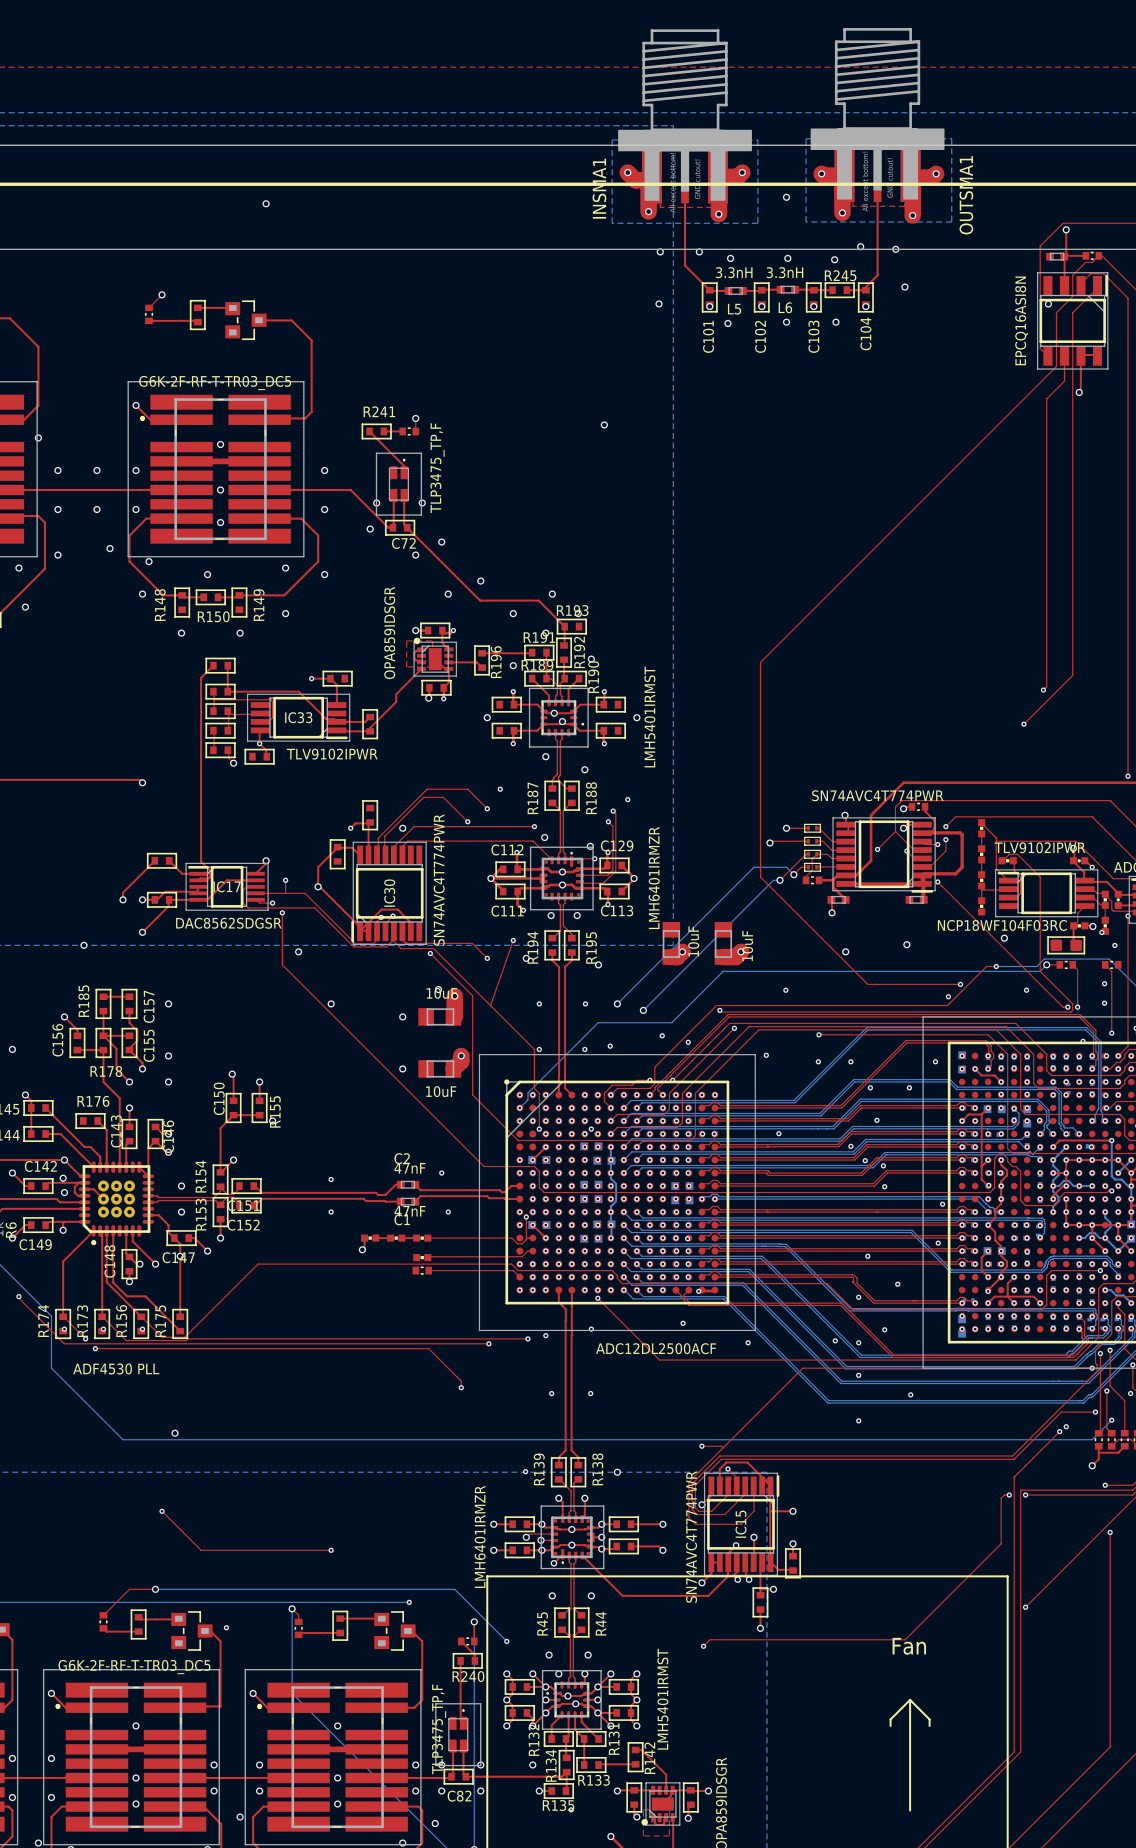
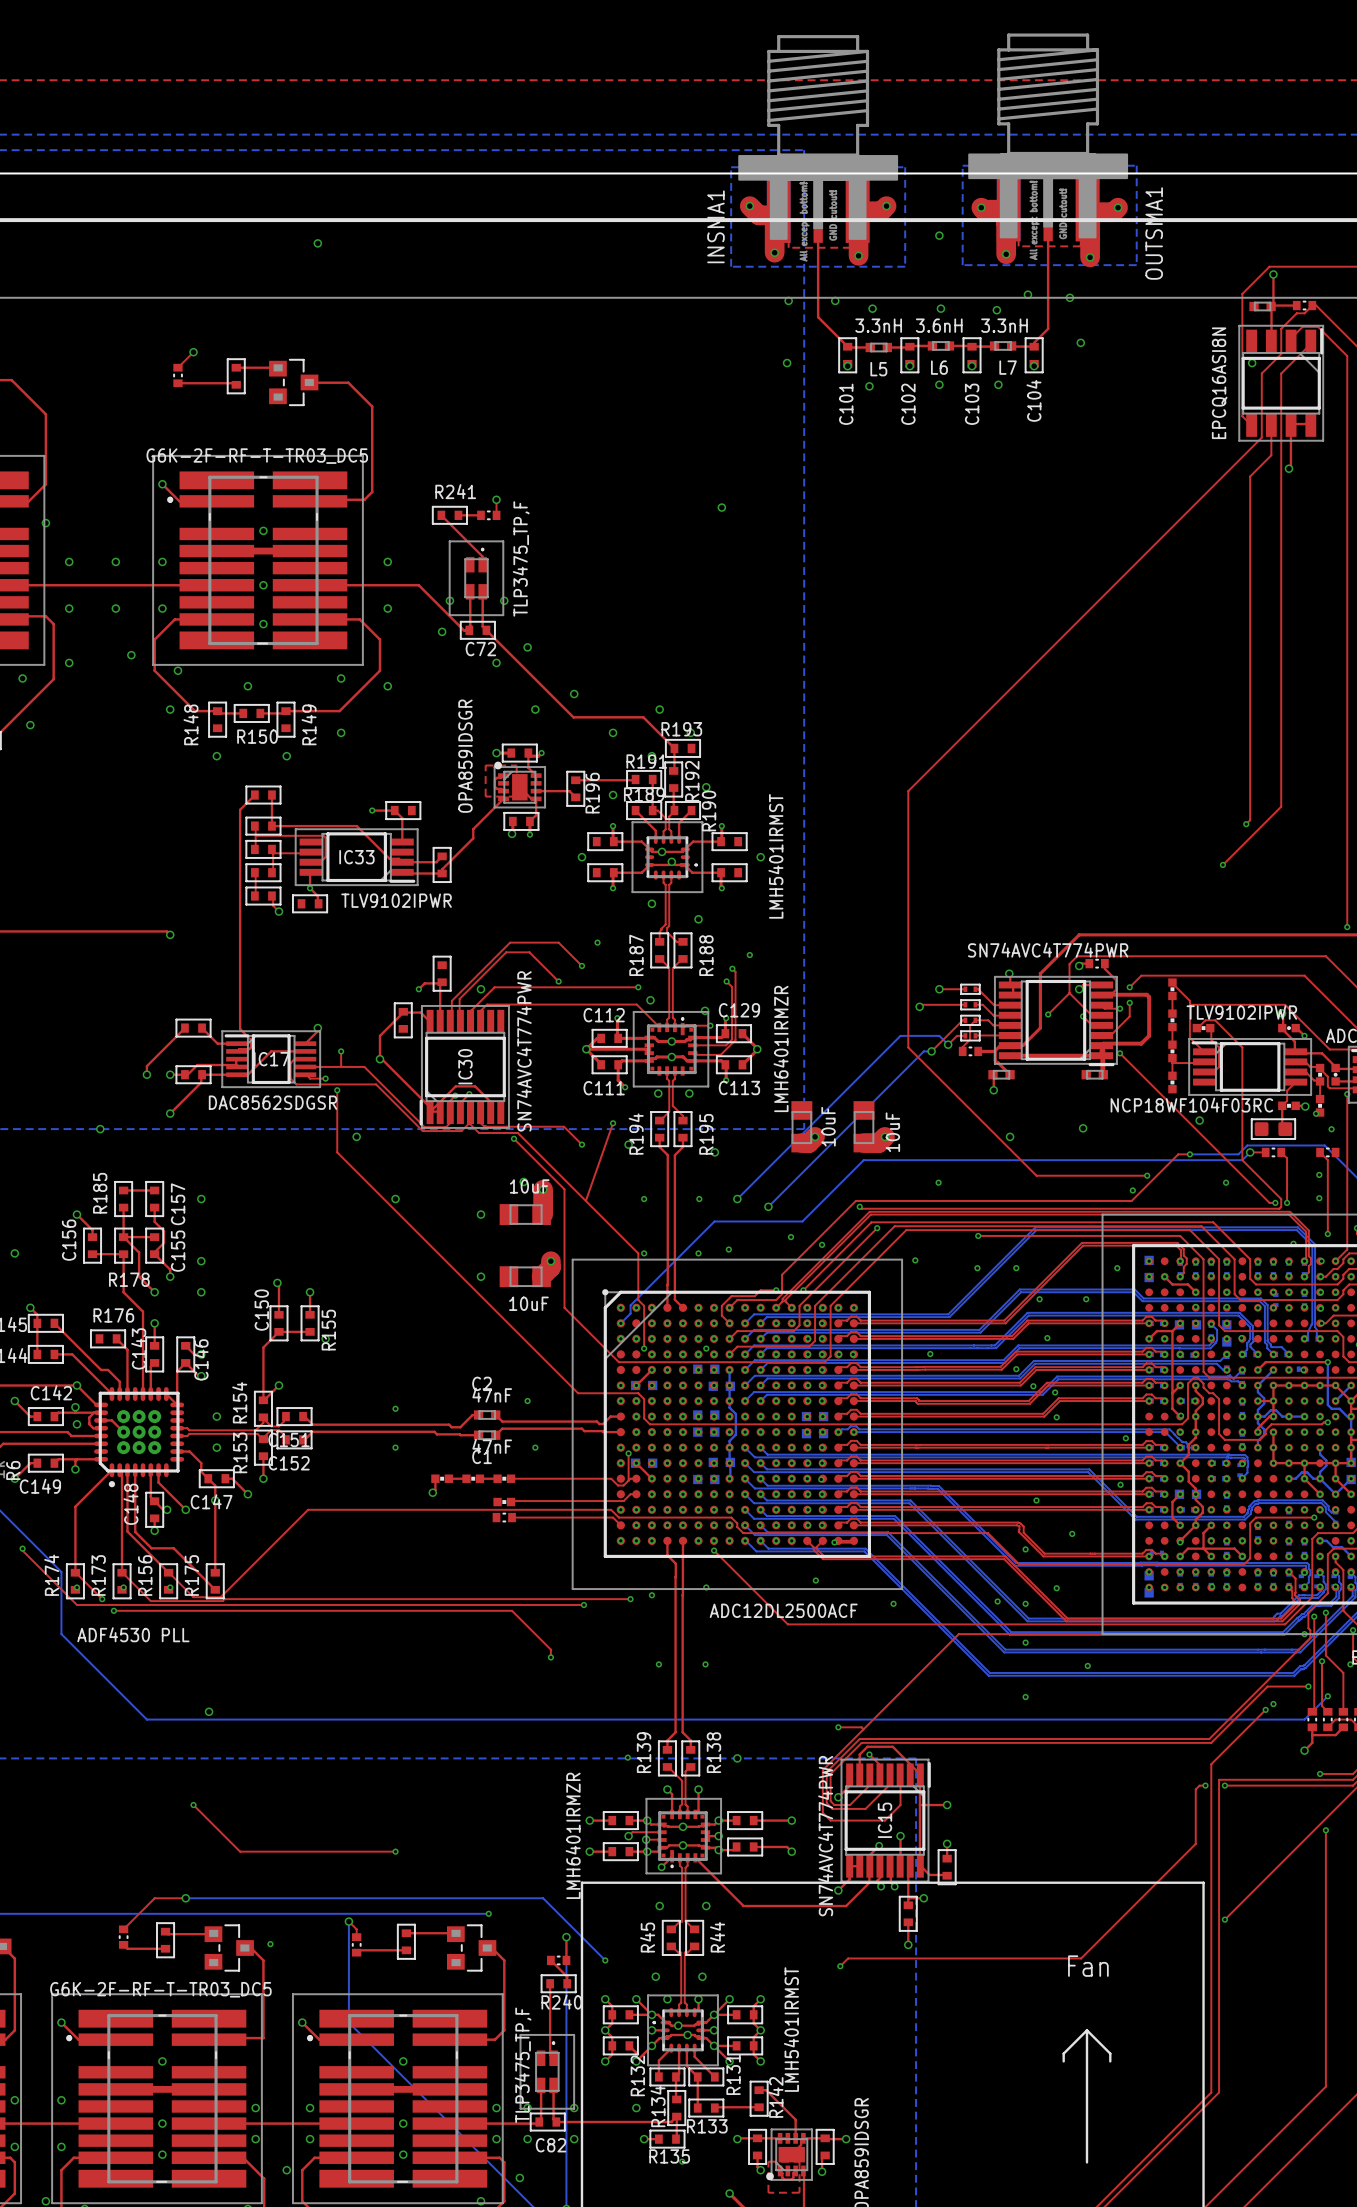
L6 value: 3.3nH (784, 272) -> 3.6nH (939, 325)
L7: none -> 3.3nH (1003, 345)
R245: (839, 290) -> none

